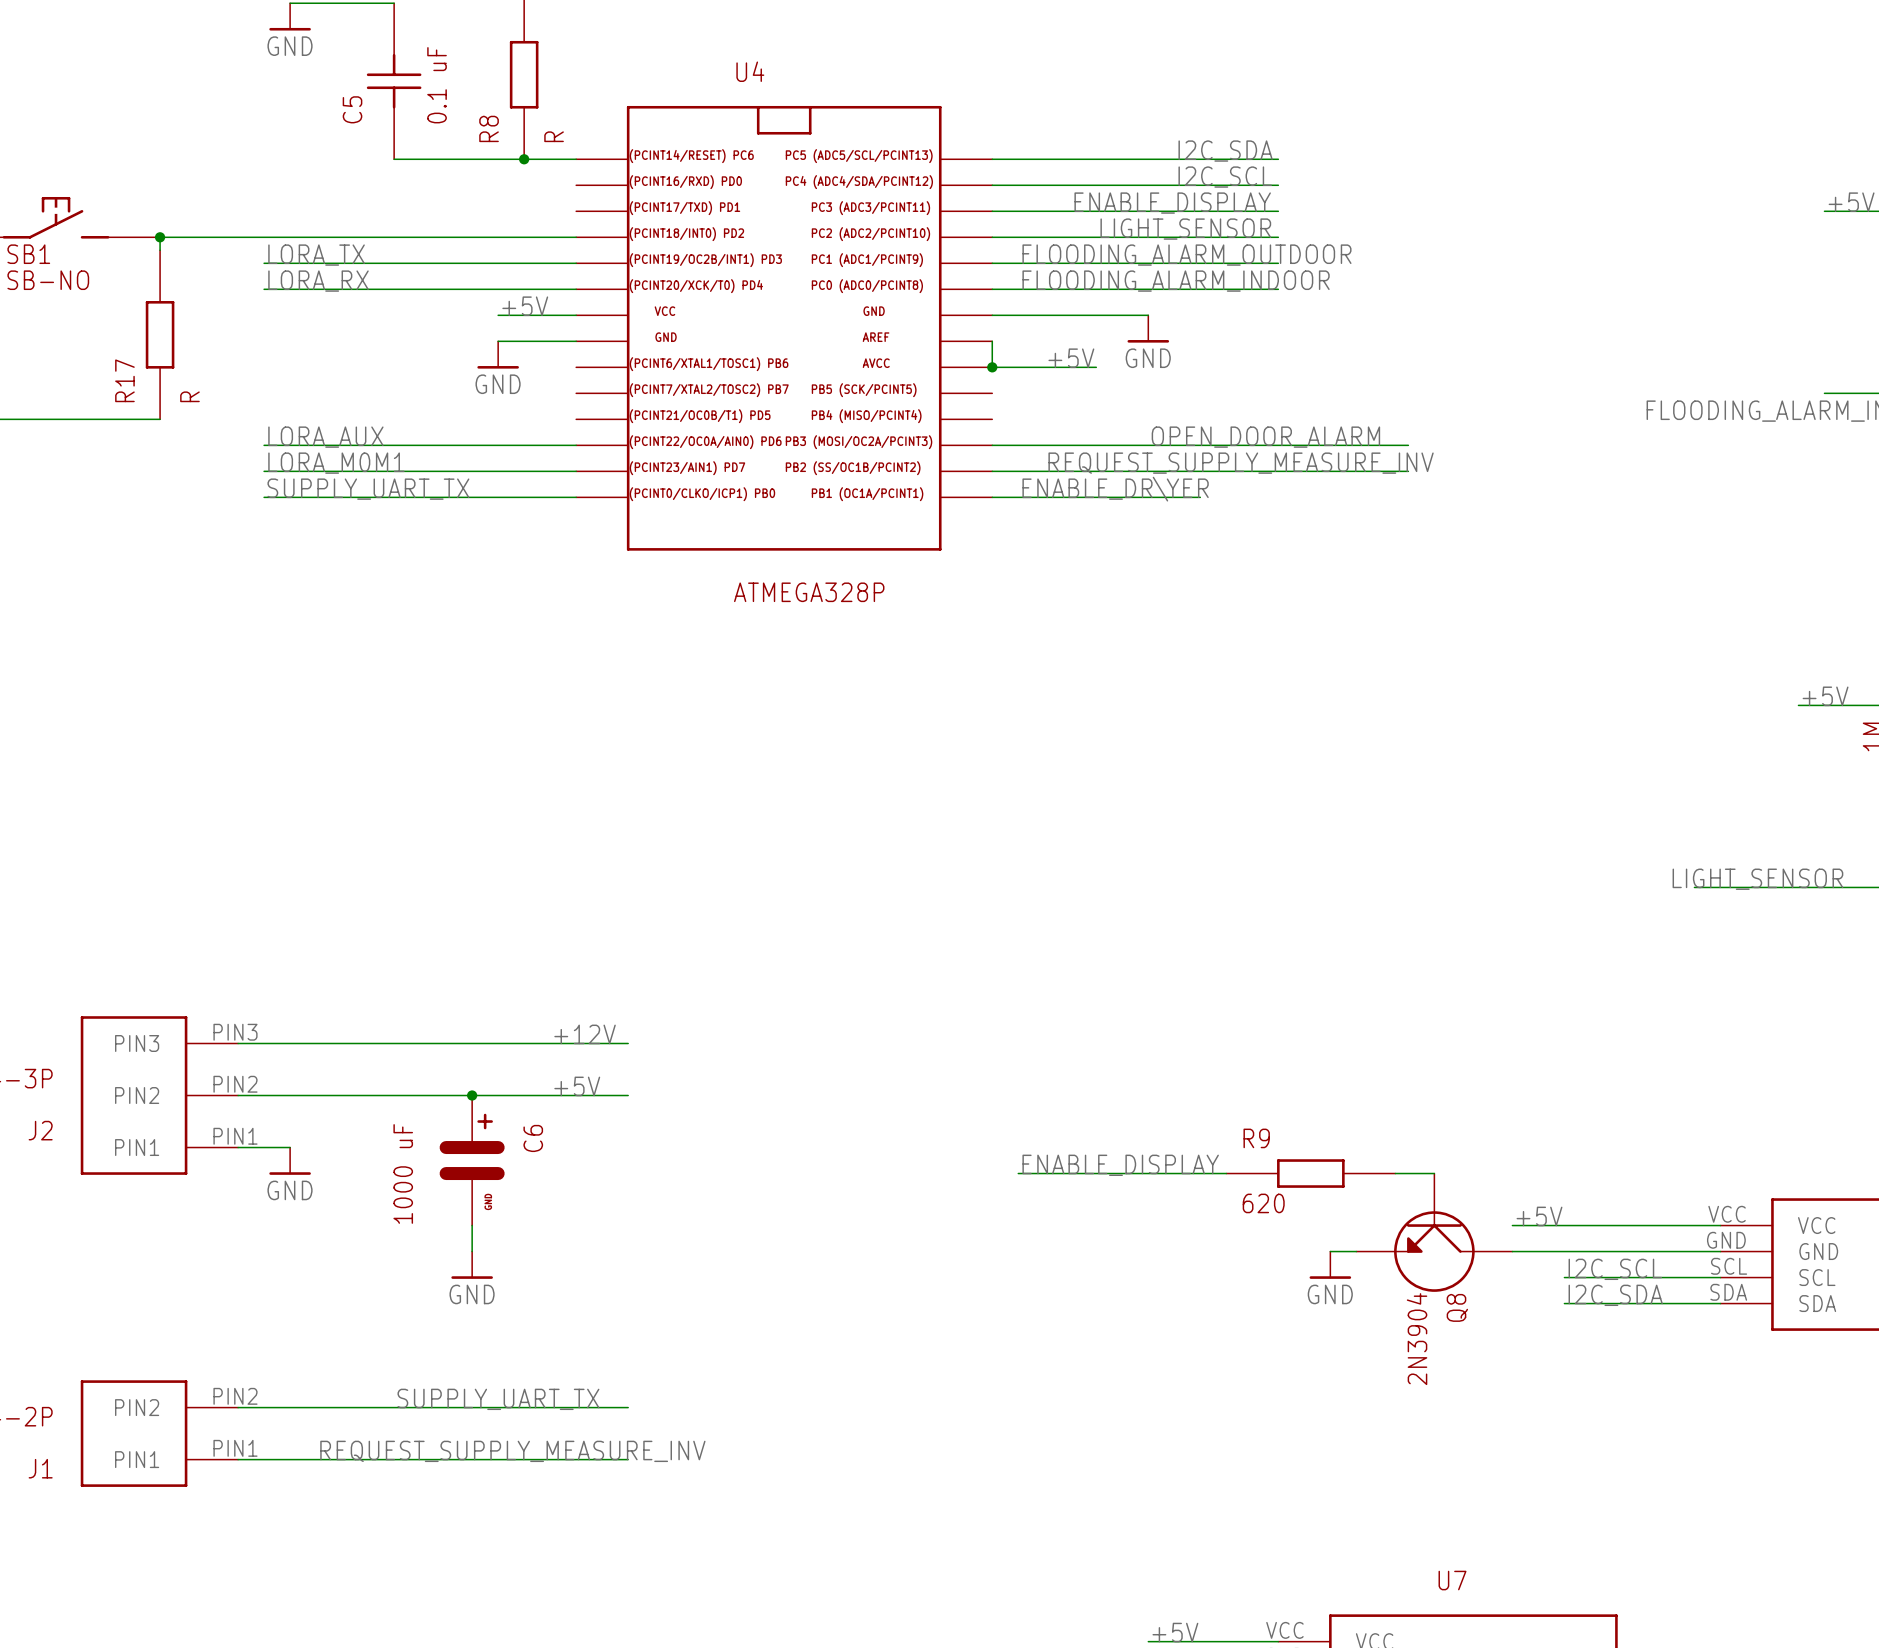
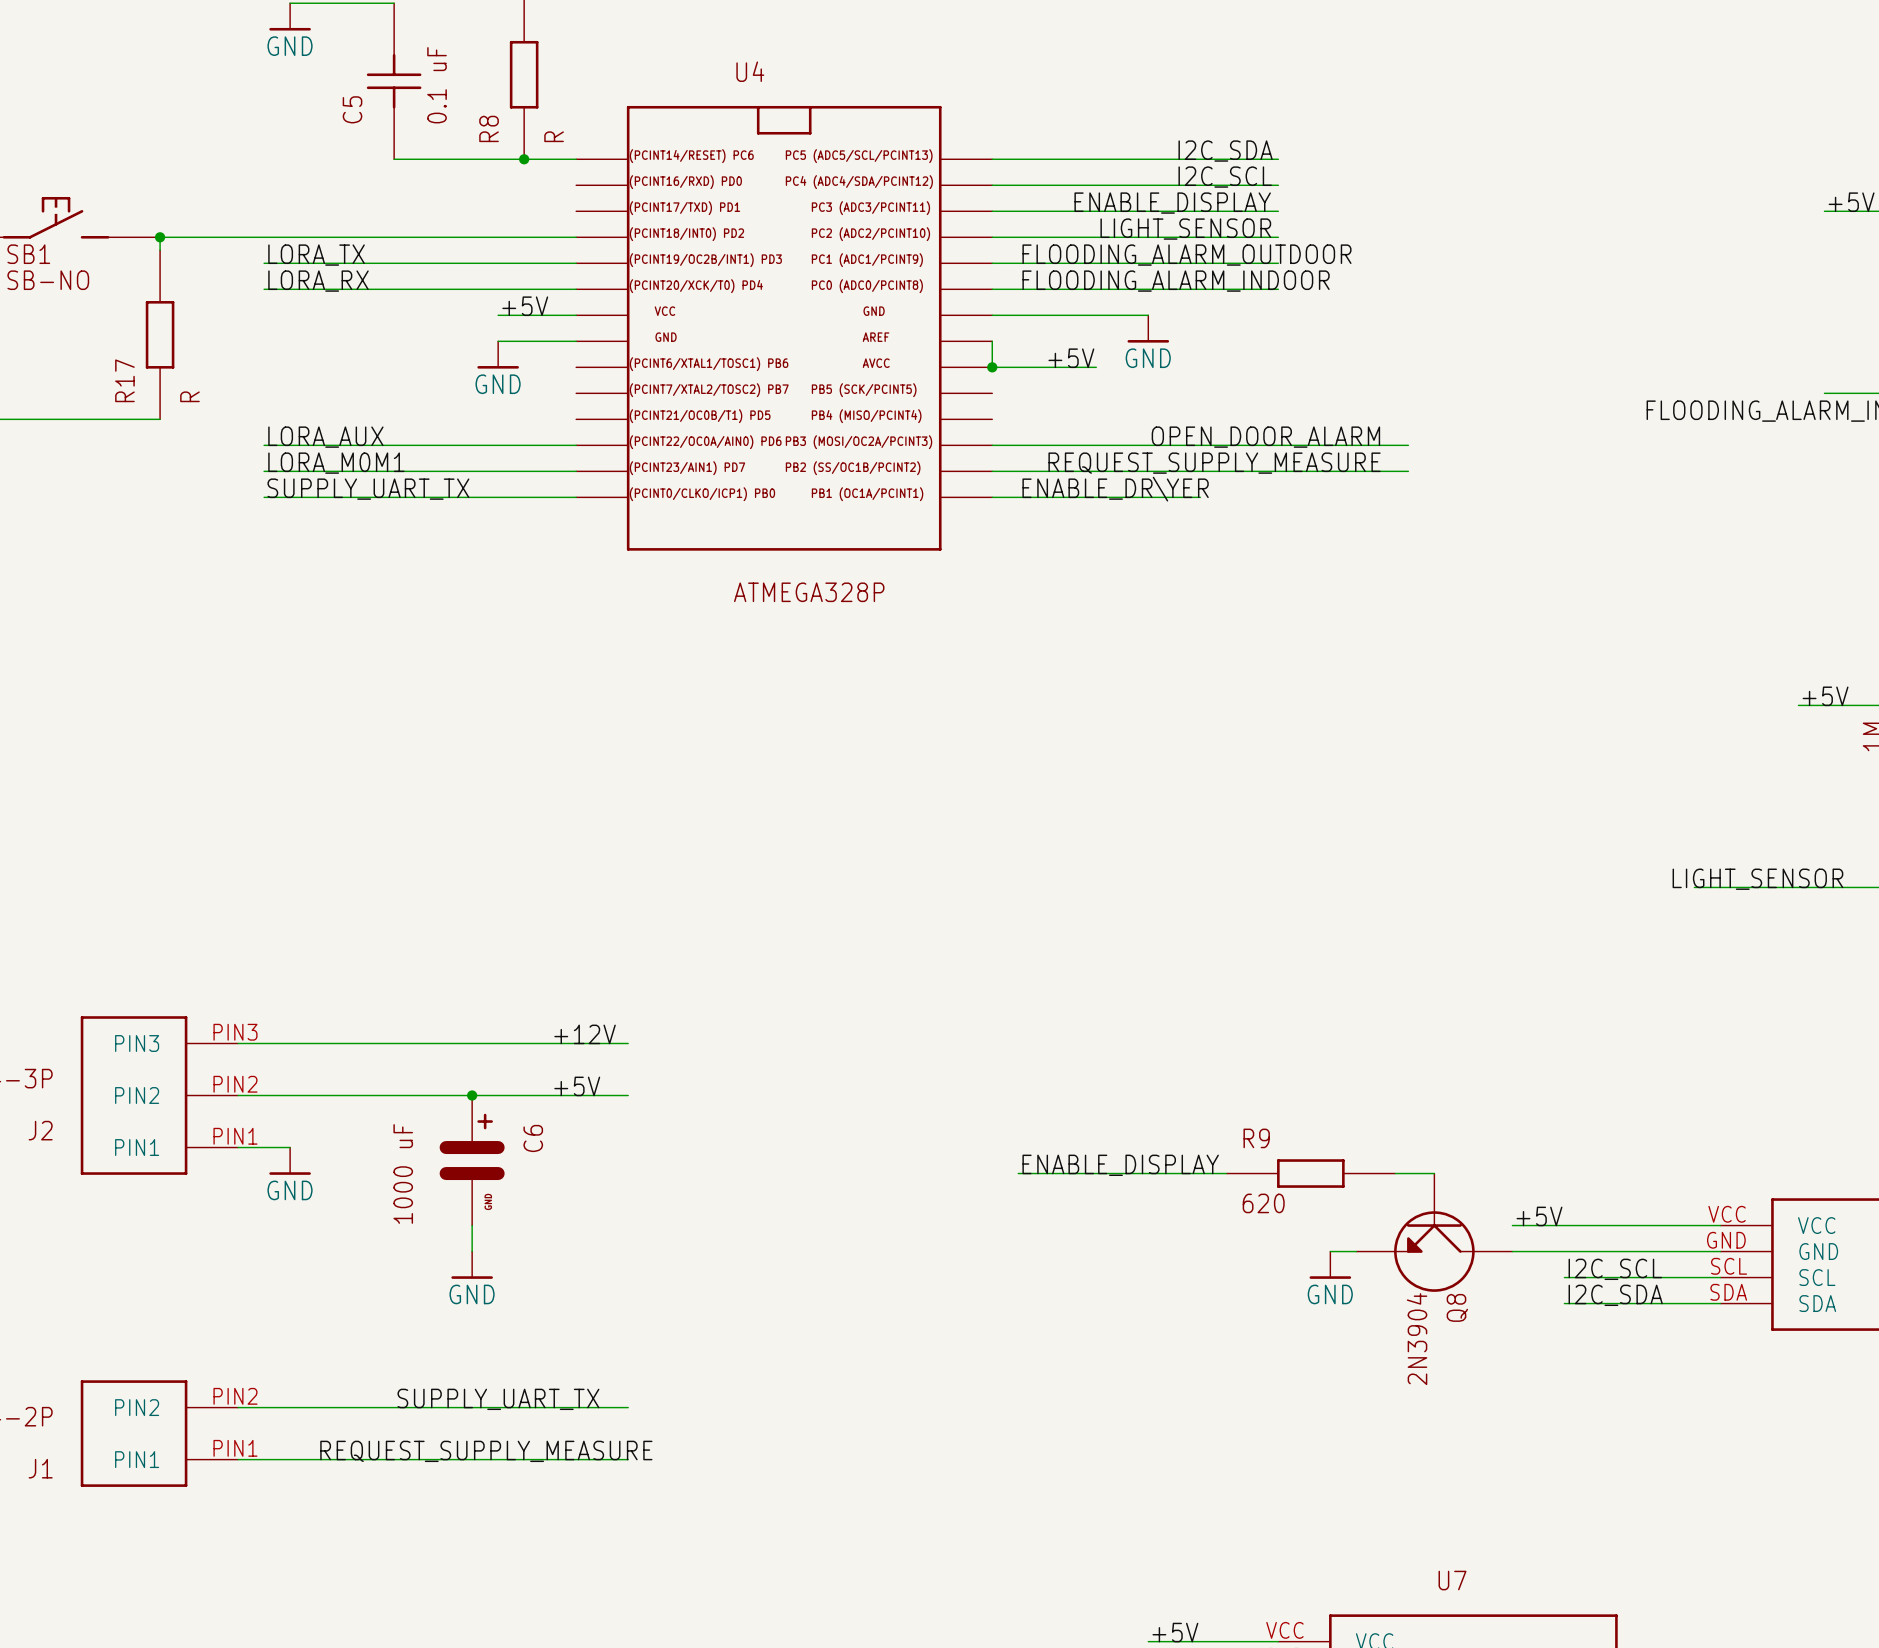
label: REQUEST_SUPPLY_MEASURE_INV (1241, 463) -> REQUEST_SUPPLY_MEASURE (1214, 463)
label: REQUEST_SUPPLY_MEASURE_INV (512, 1451) -> REQUEST_SUPPLY_MEASURE (486, 1451)

